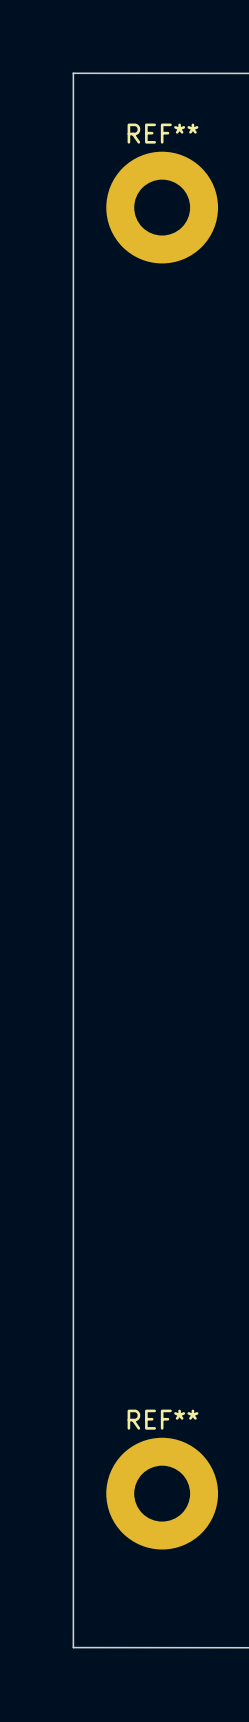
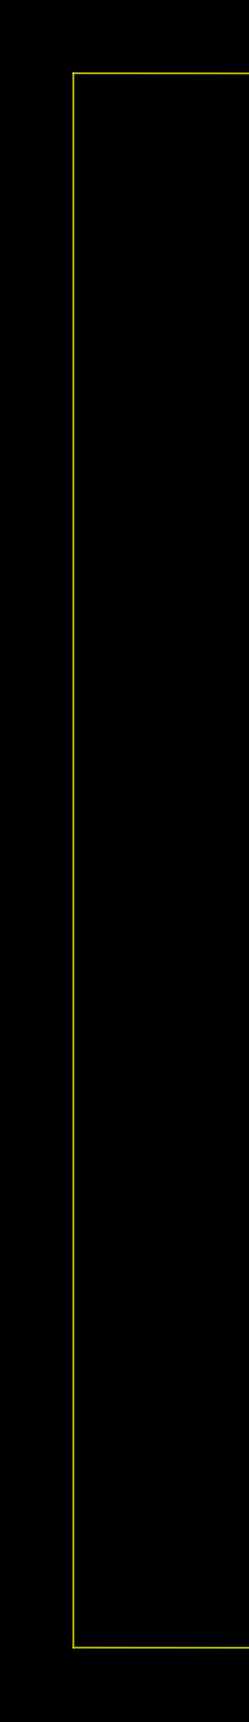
REF**: (162, 207) -> none
REF**: (162, 1493) -> none

